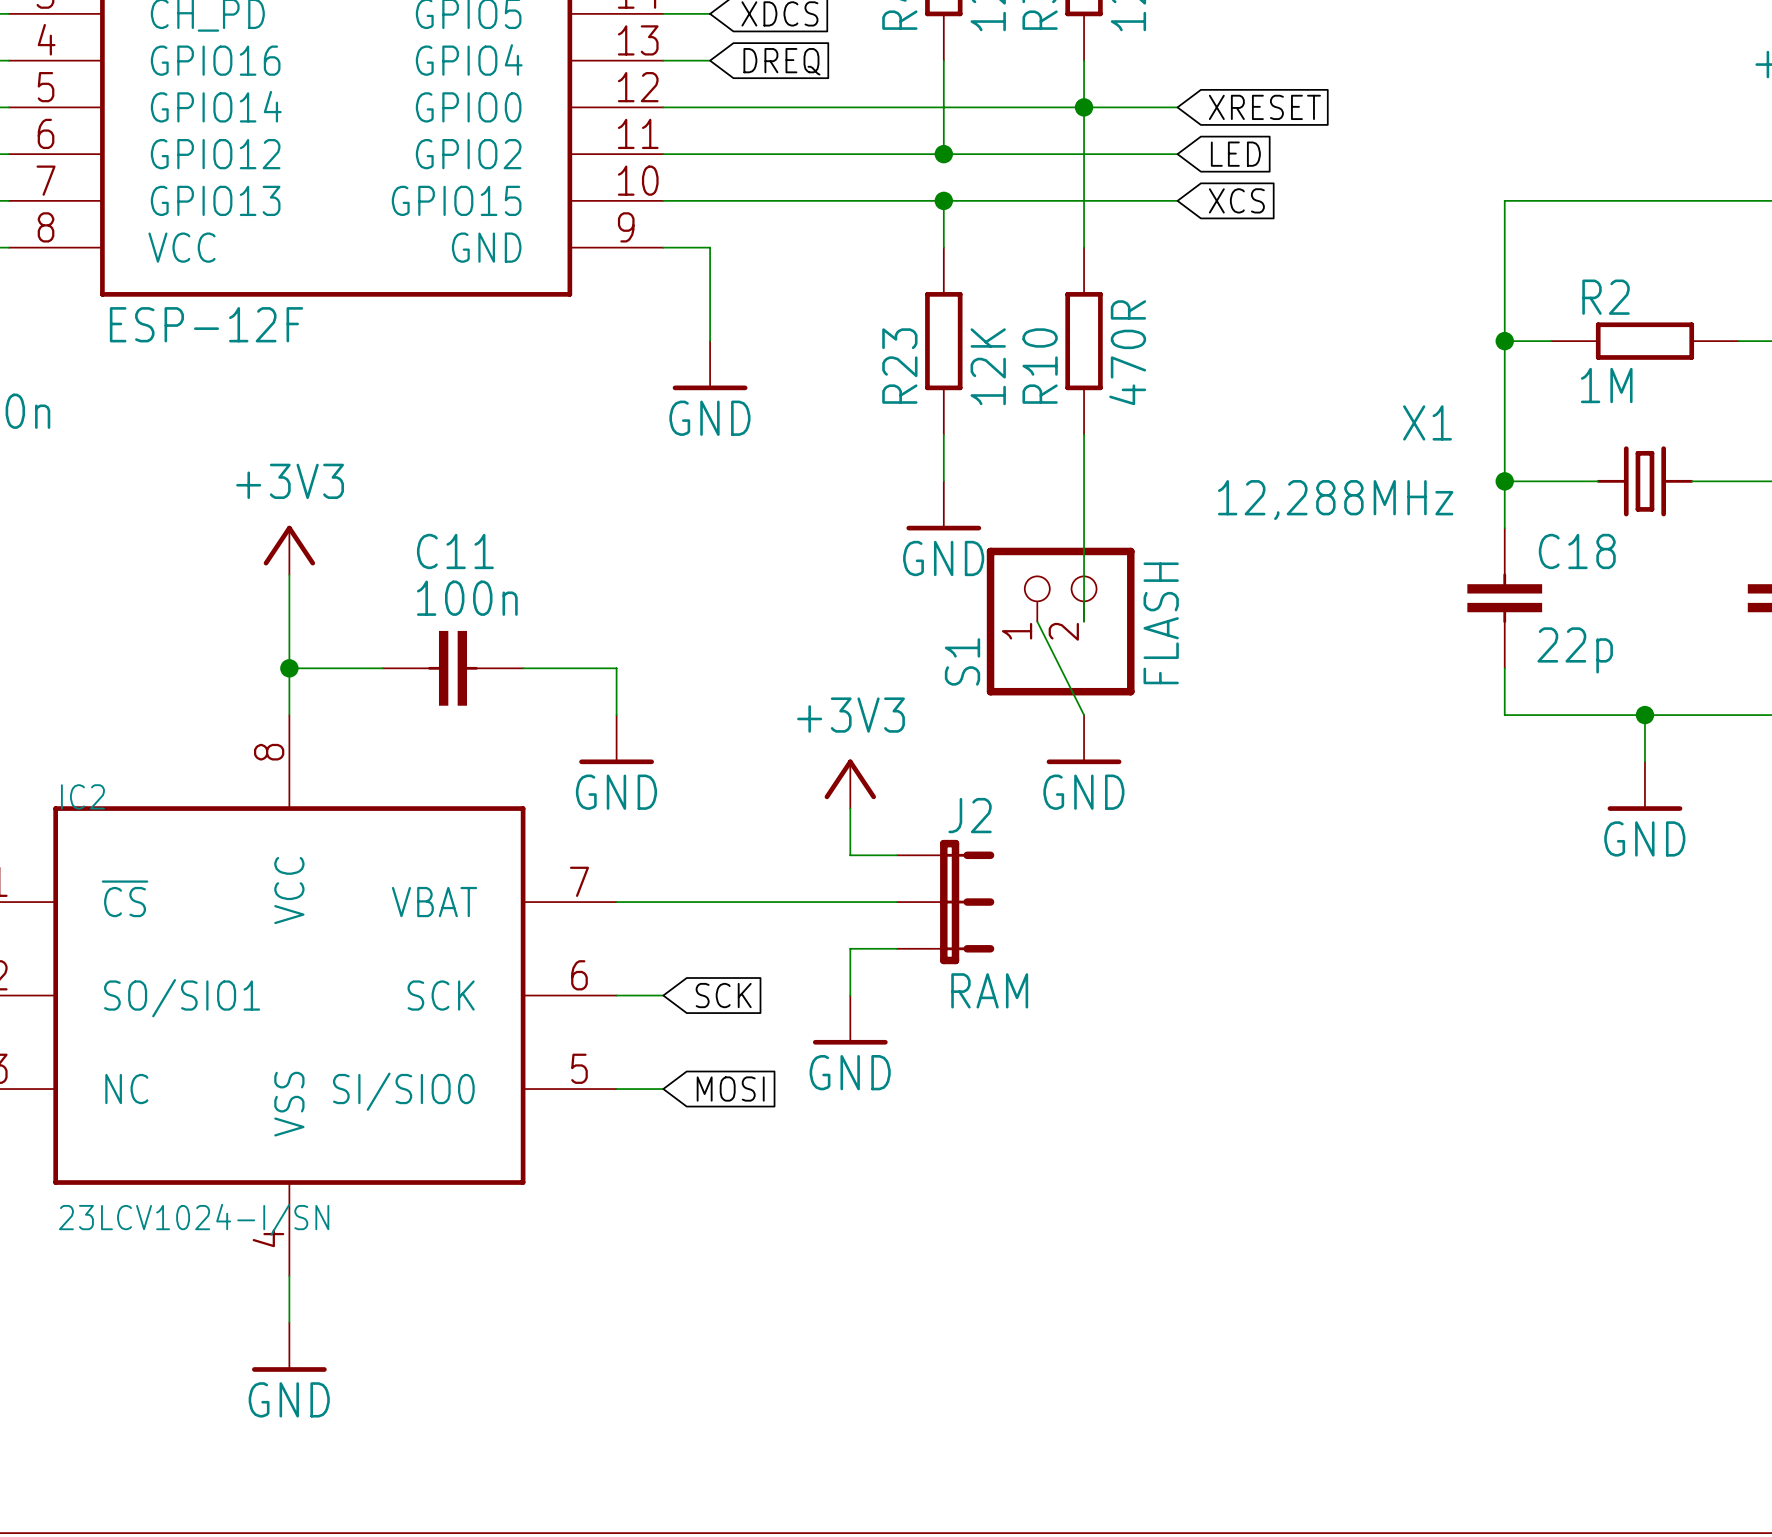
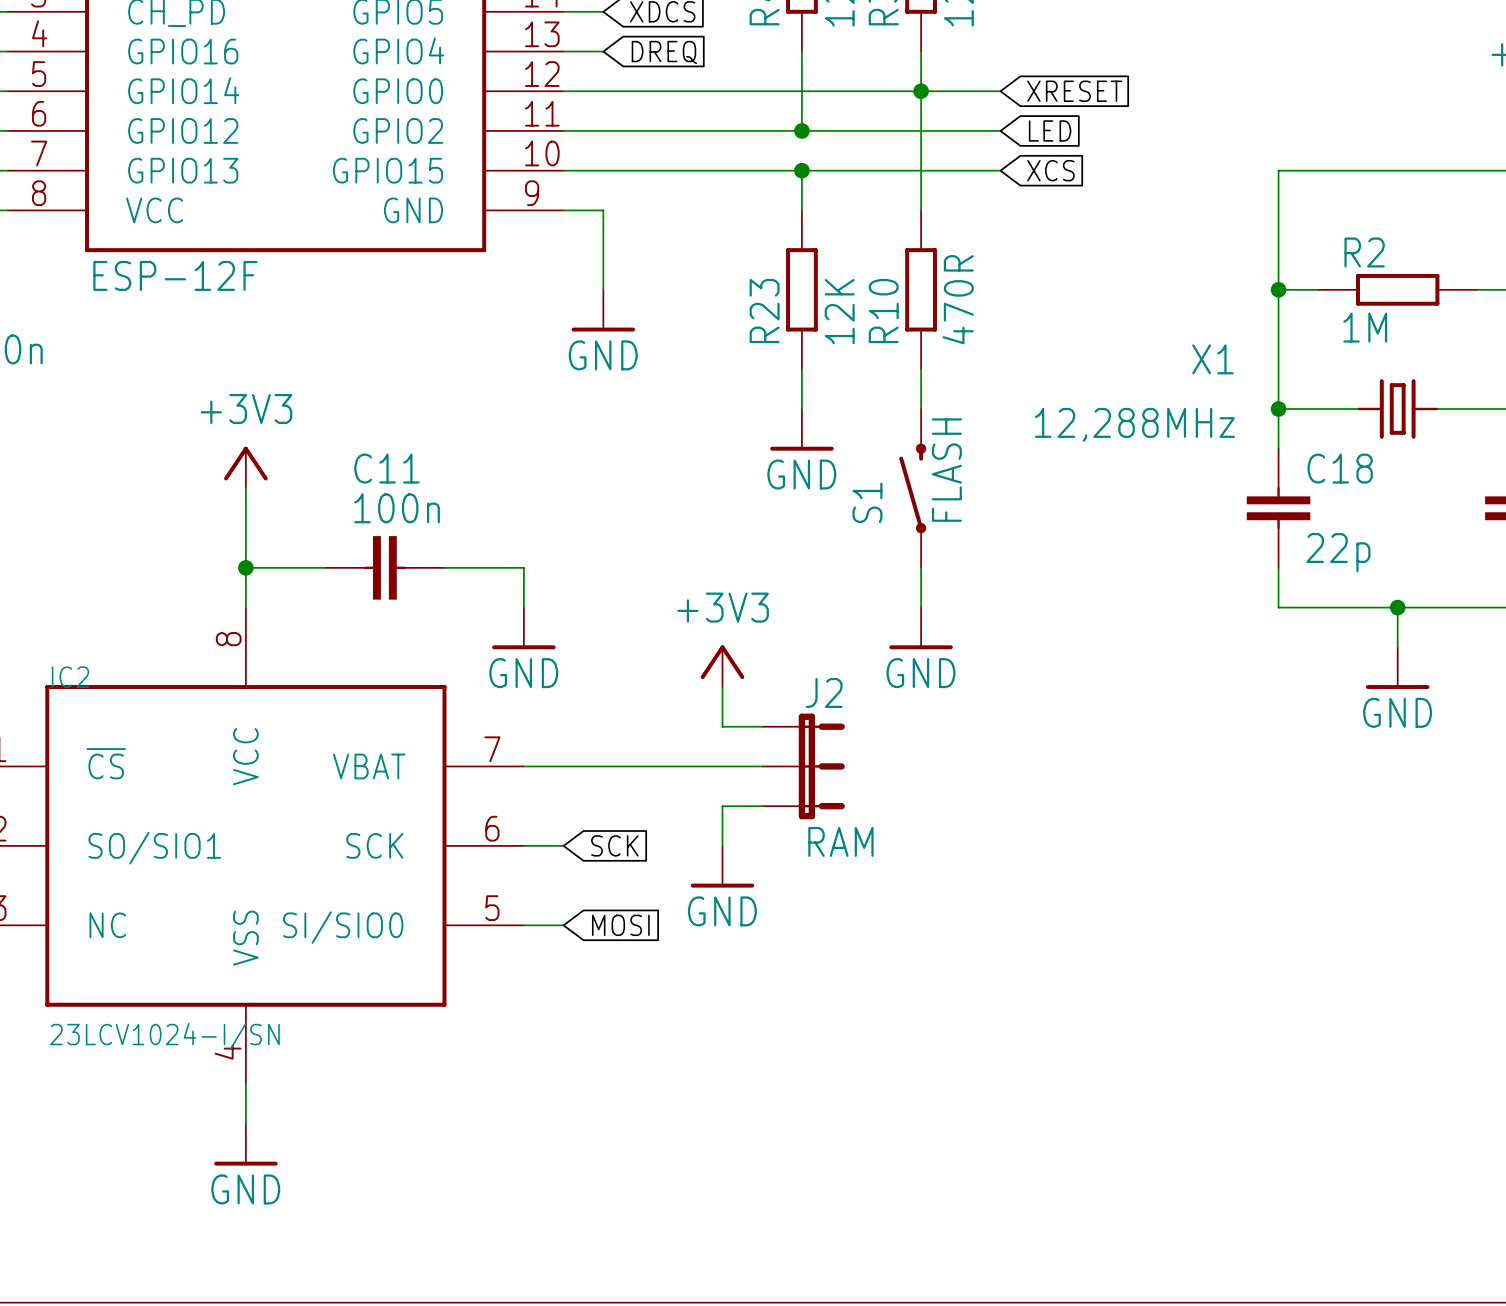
wire: (1084, 481) (1084, 621) -> none
S1 symbol: [986, 547, 1135, 696] -> [899, 408, 927, 568]
wire: (1037, 621) (1084, 715) -> (921, 567) (921, 607)
S1 value position: FLASH (1161, 623) -> FLASH (946, 470)
S1 name position: S1 (962, 661) -> S1 (867, 502)

